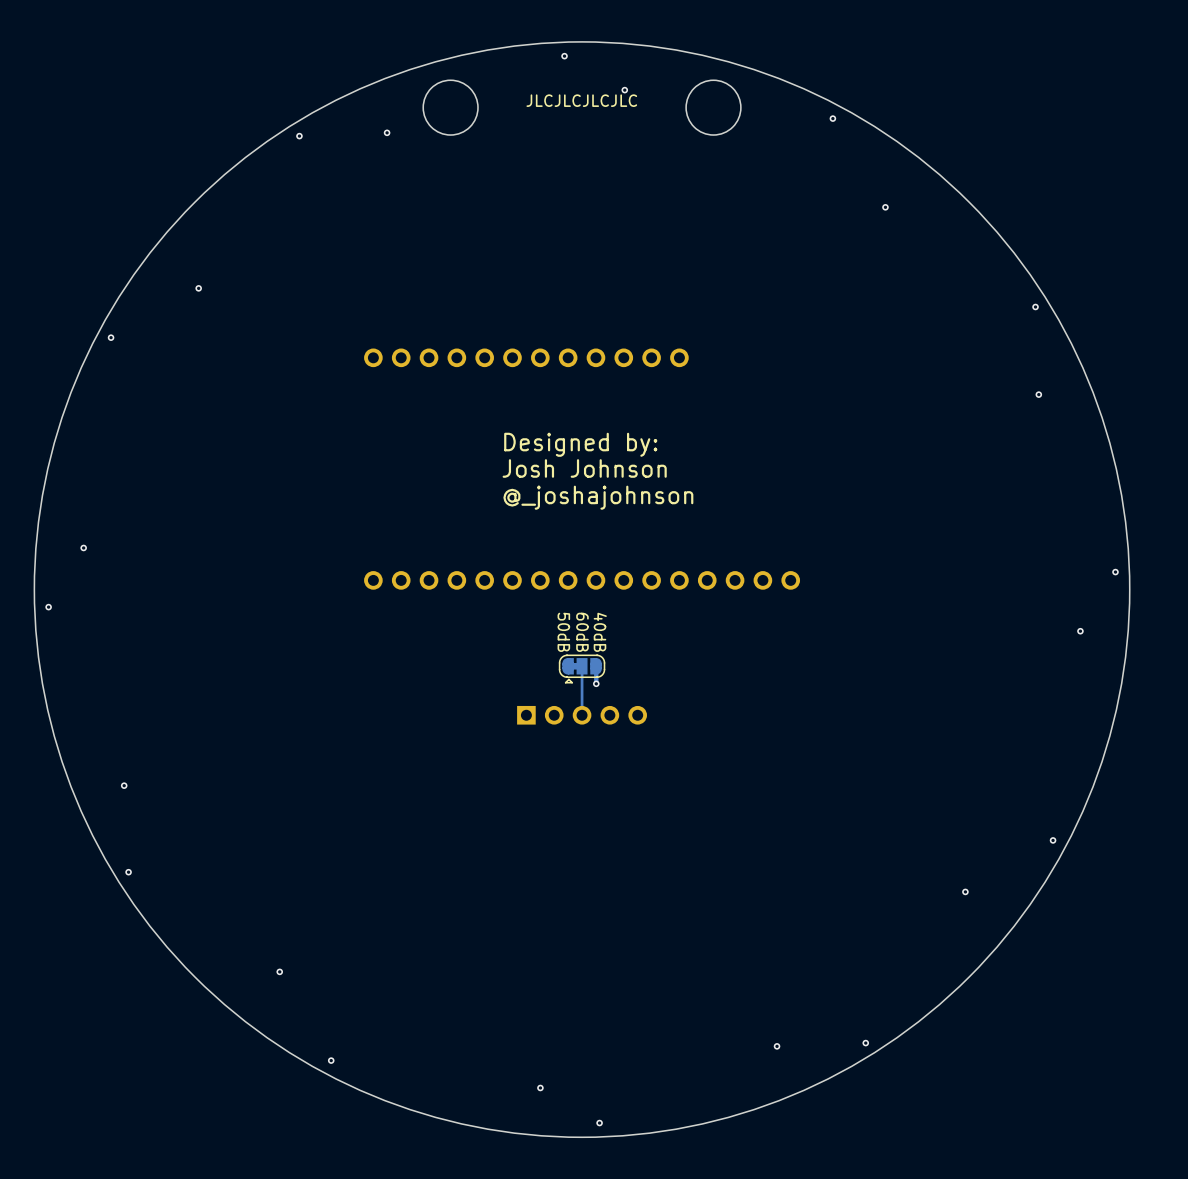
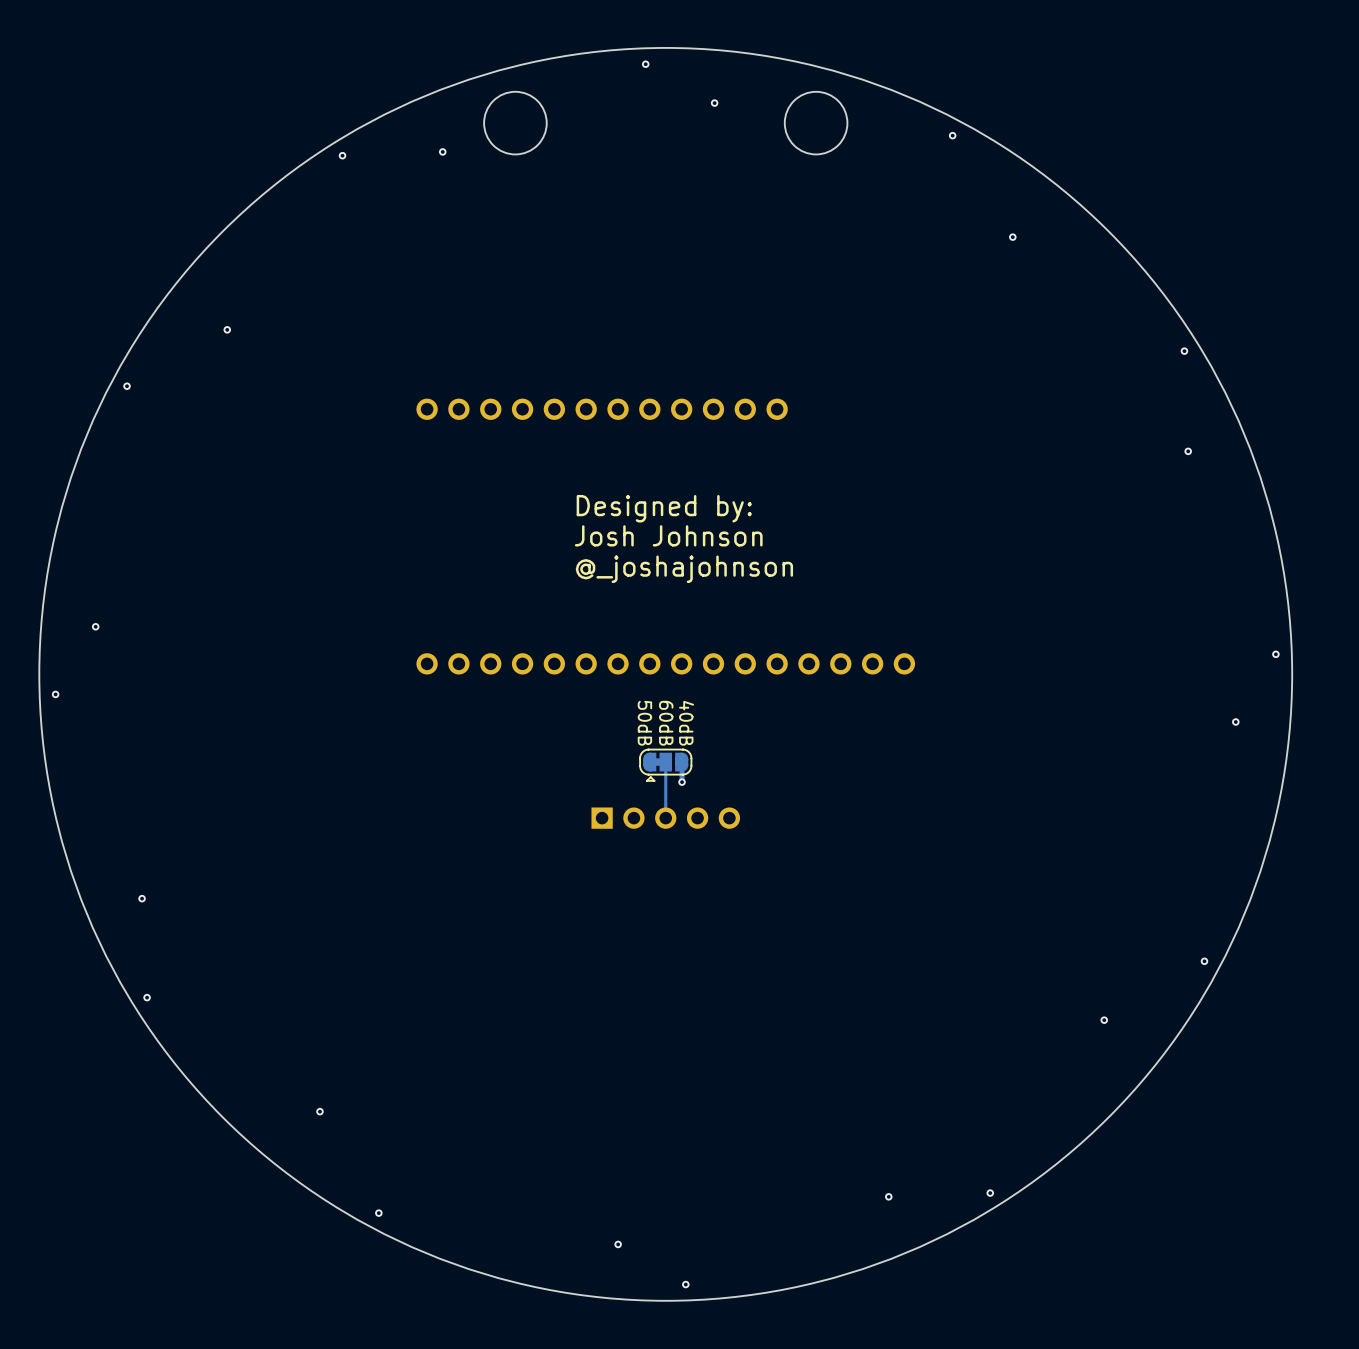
text: JLCJLCJLCJLC (581, 100) -> none

